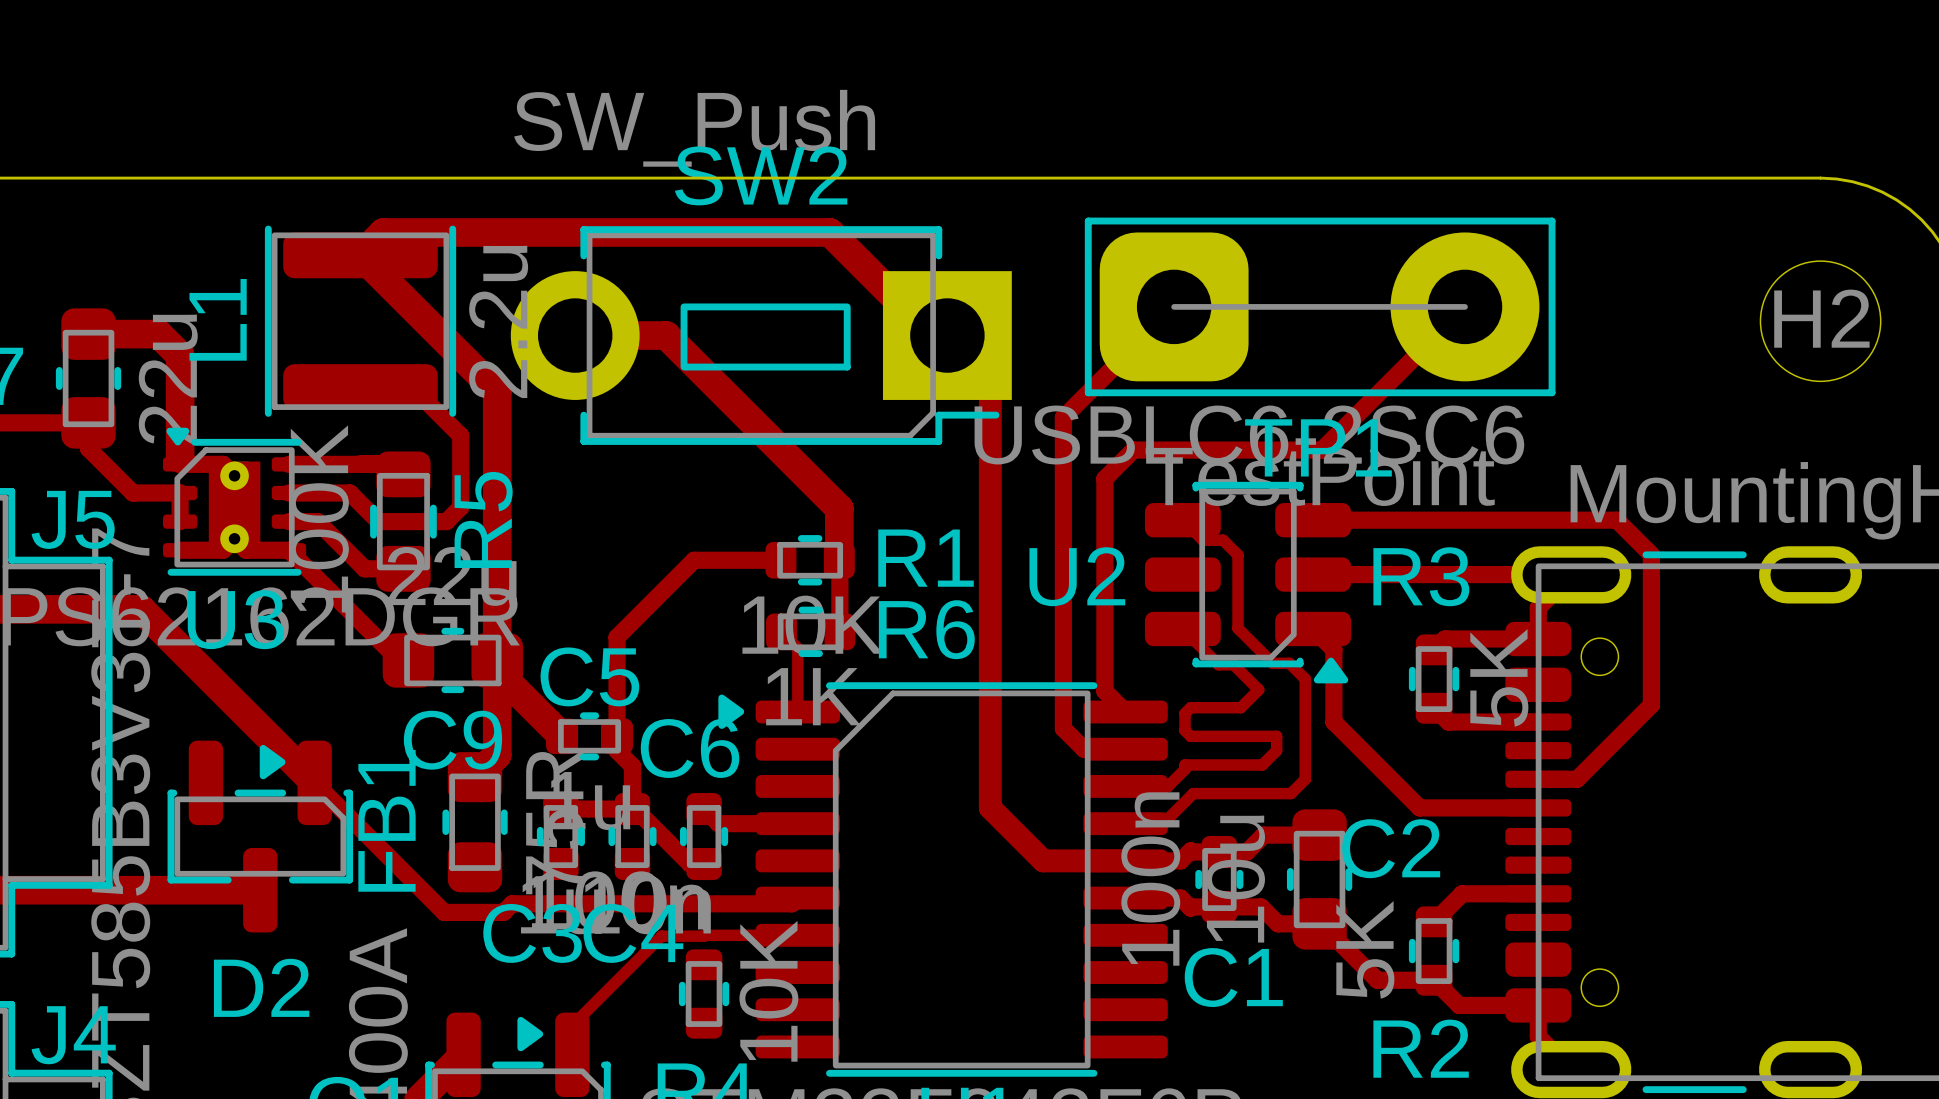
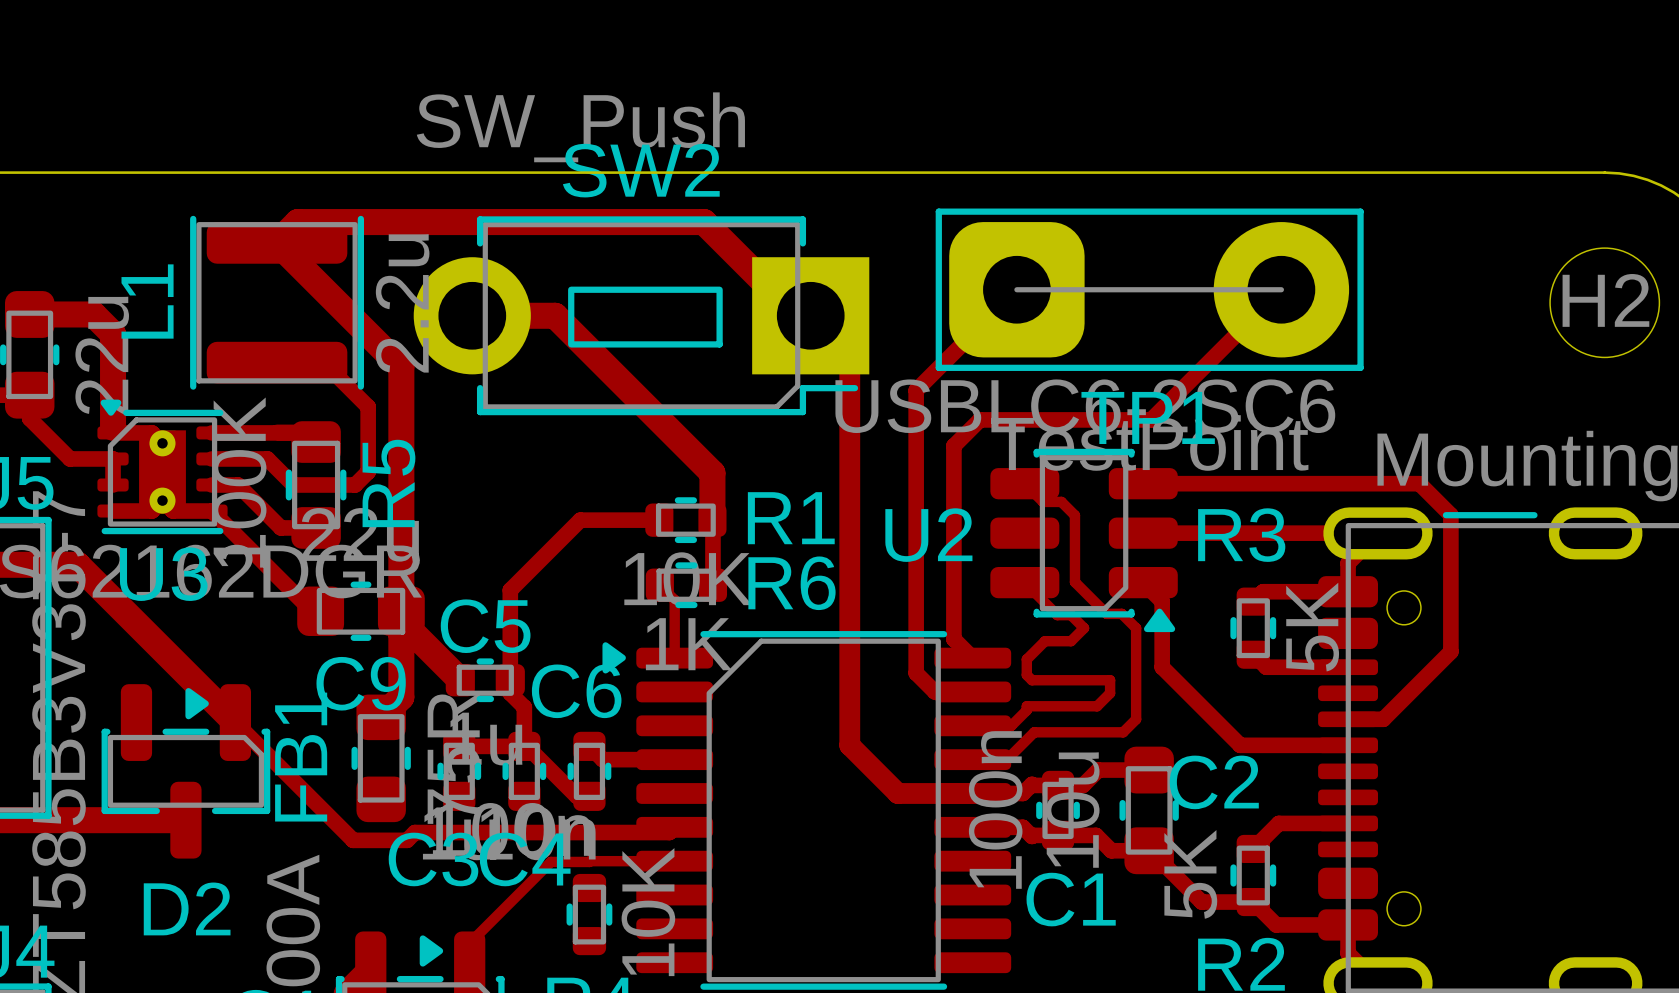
top track: (1248, 679) (1258, 689) (1240, 707) (1190, 707) -> (1084, 628) (1071, 641) (1045, 641) (1032, 654)

